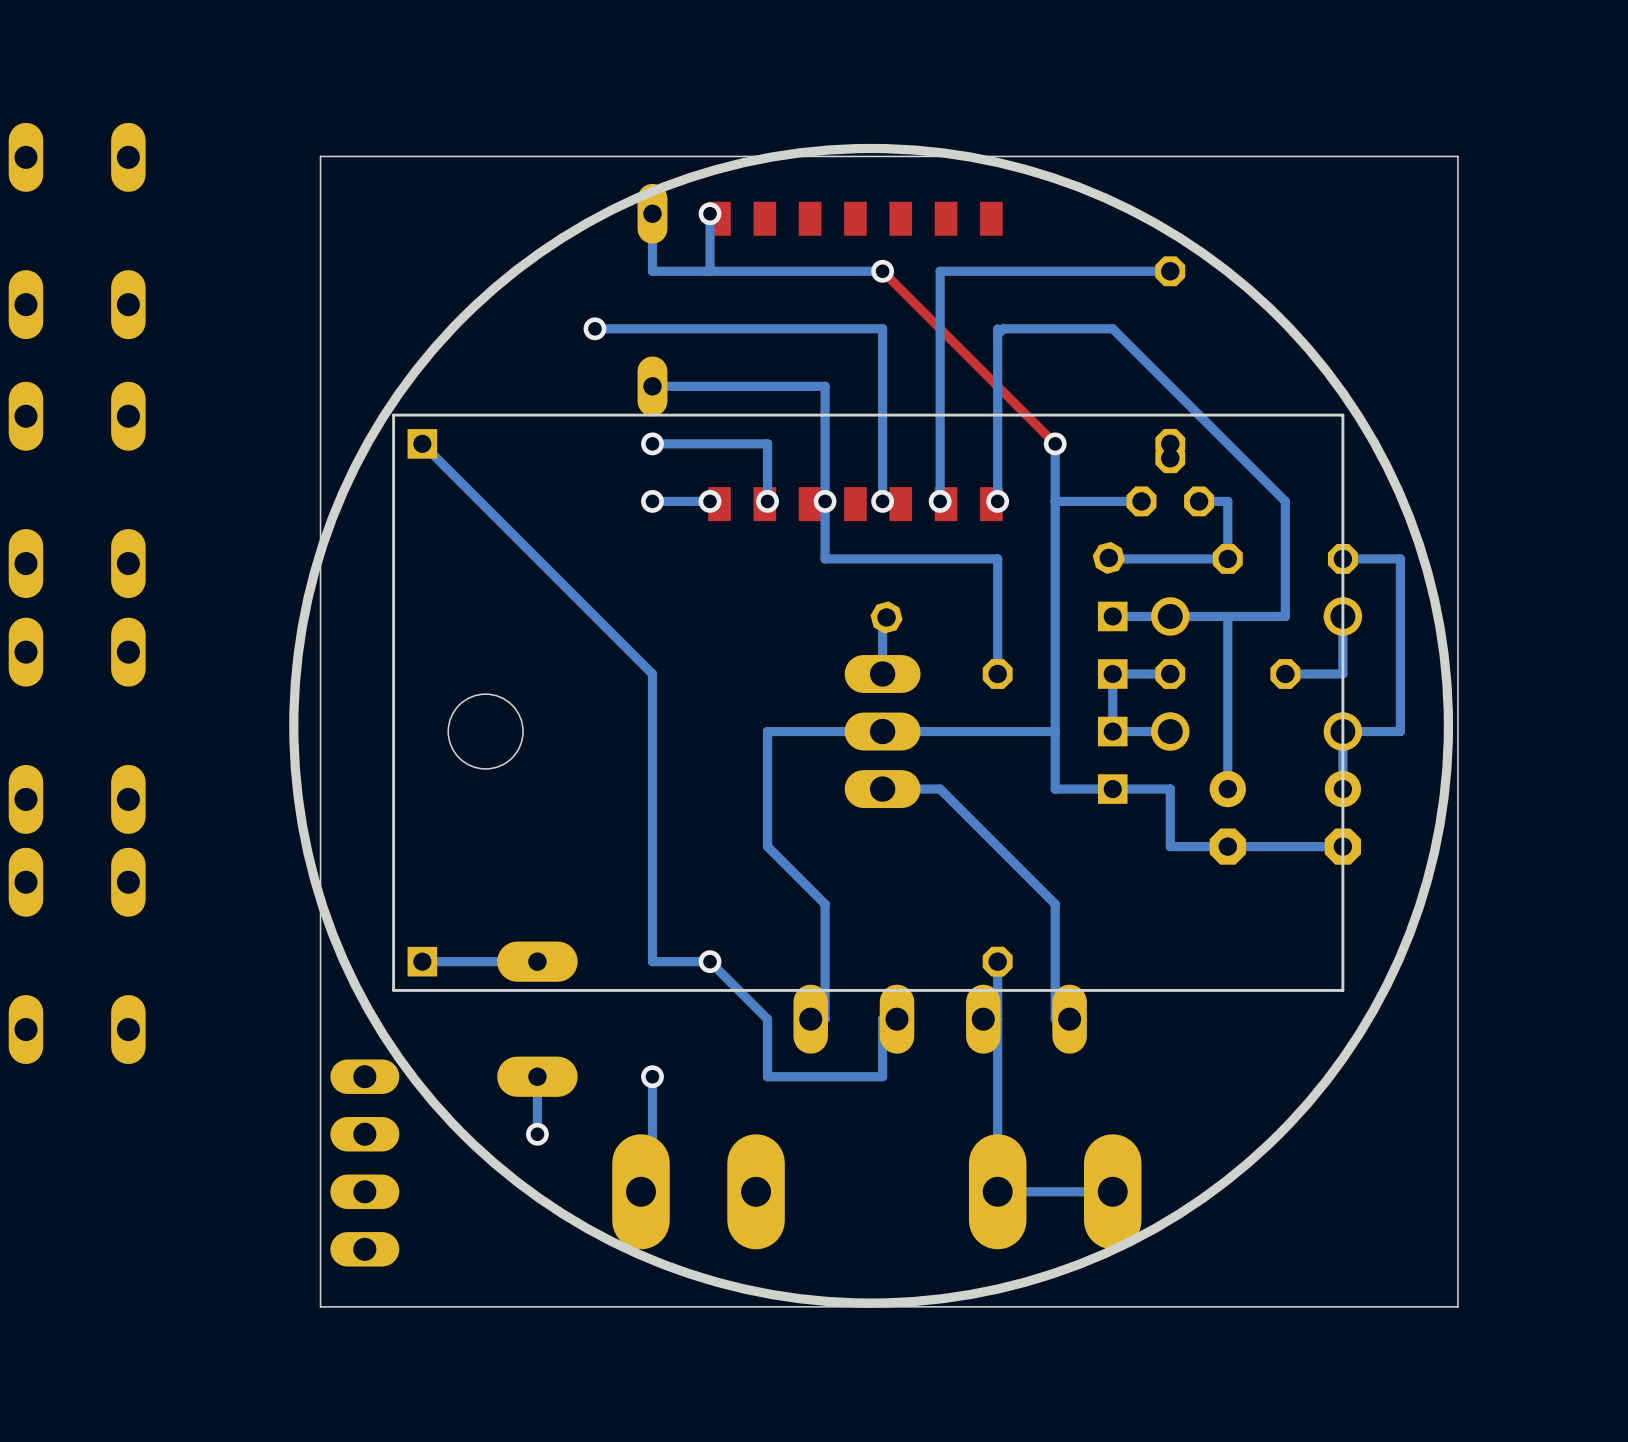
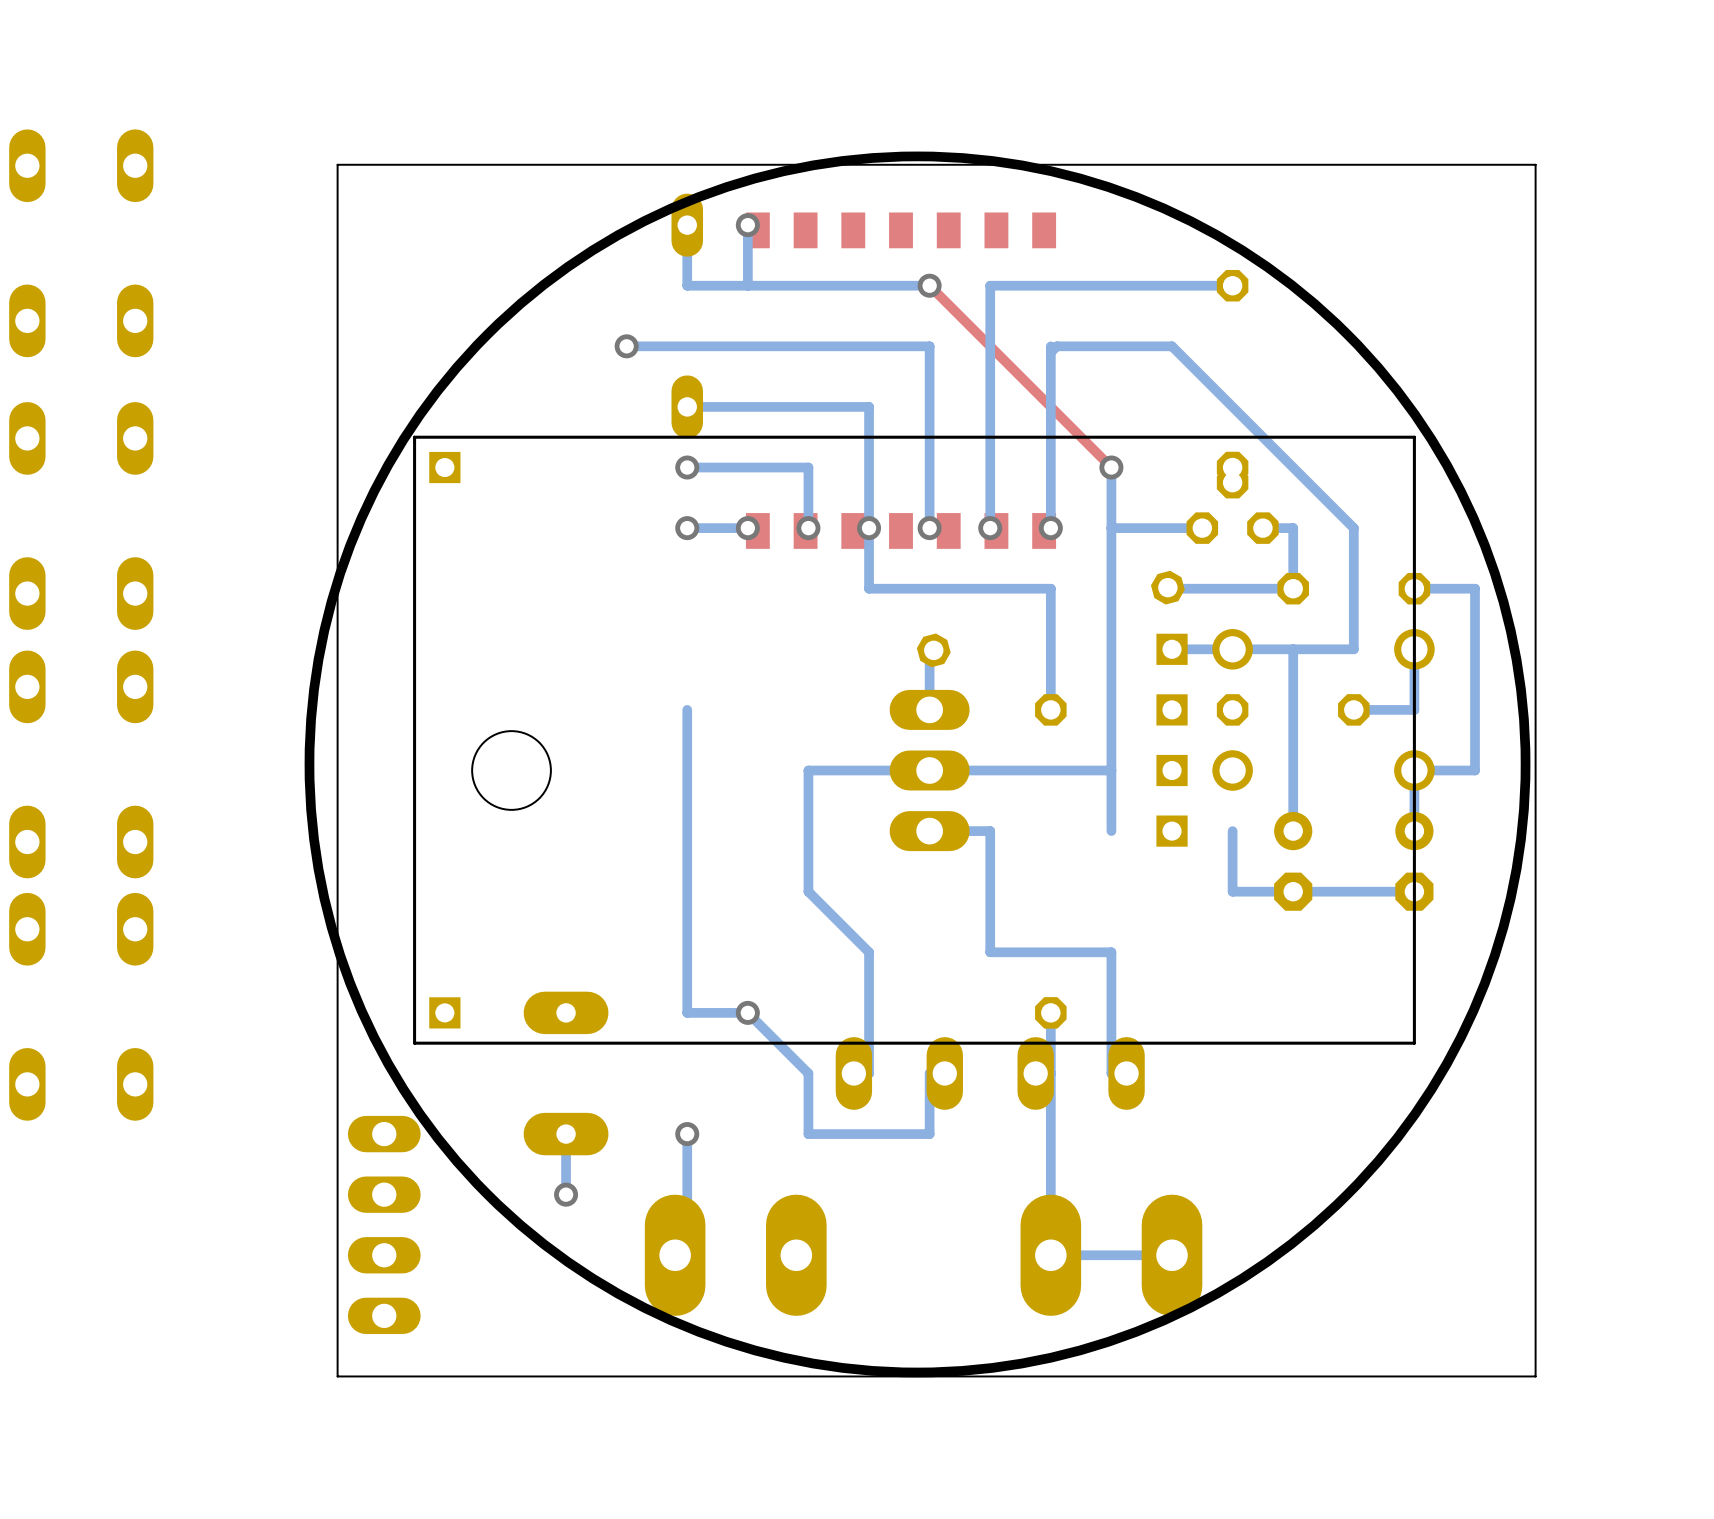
bottom track: (422, 443) (652, 674) -> none
bottom track: (1170, 674) (1112, 674) (1112, 731) (1170, 731) -> none
bottom track: (940, 789) (1055, 904) -> (990, 831) (990, 952) (1111, 952)
bottom track: (1170, 789) (1055, 789) -> none
bottom track: (537, 961) (422, 961) -> none

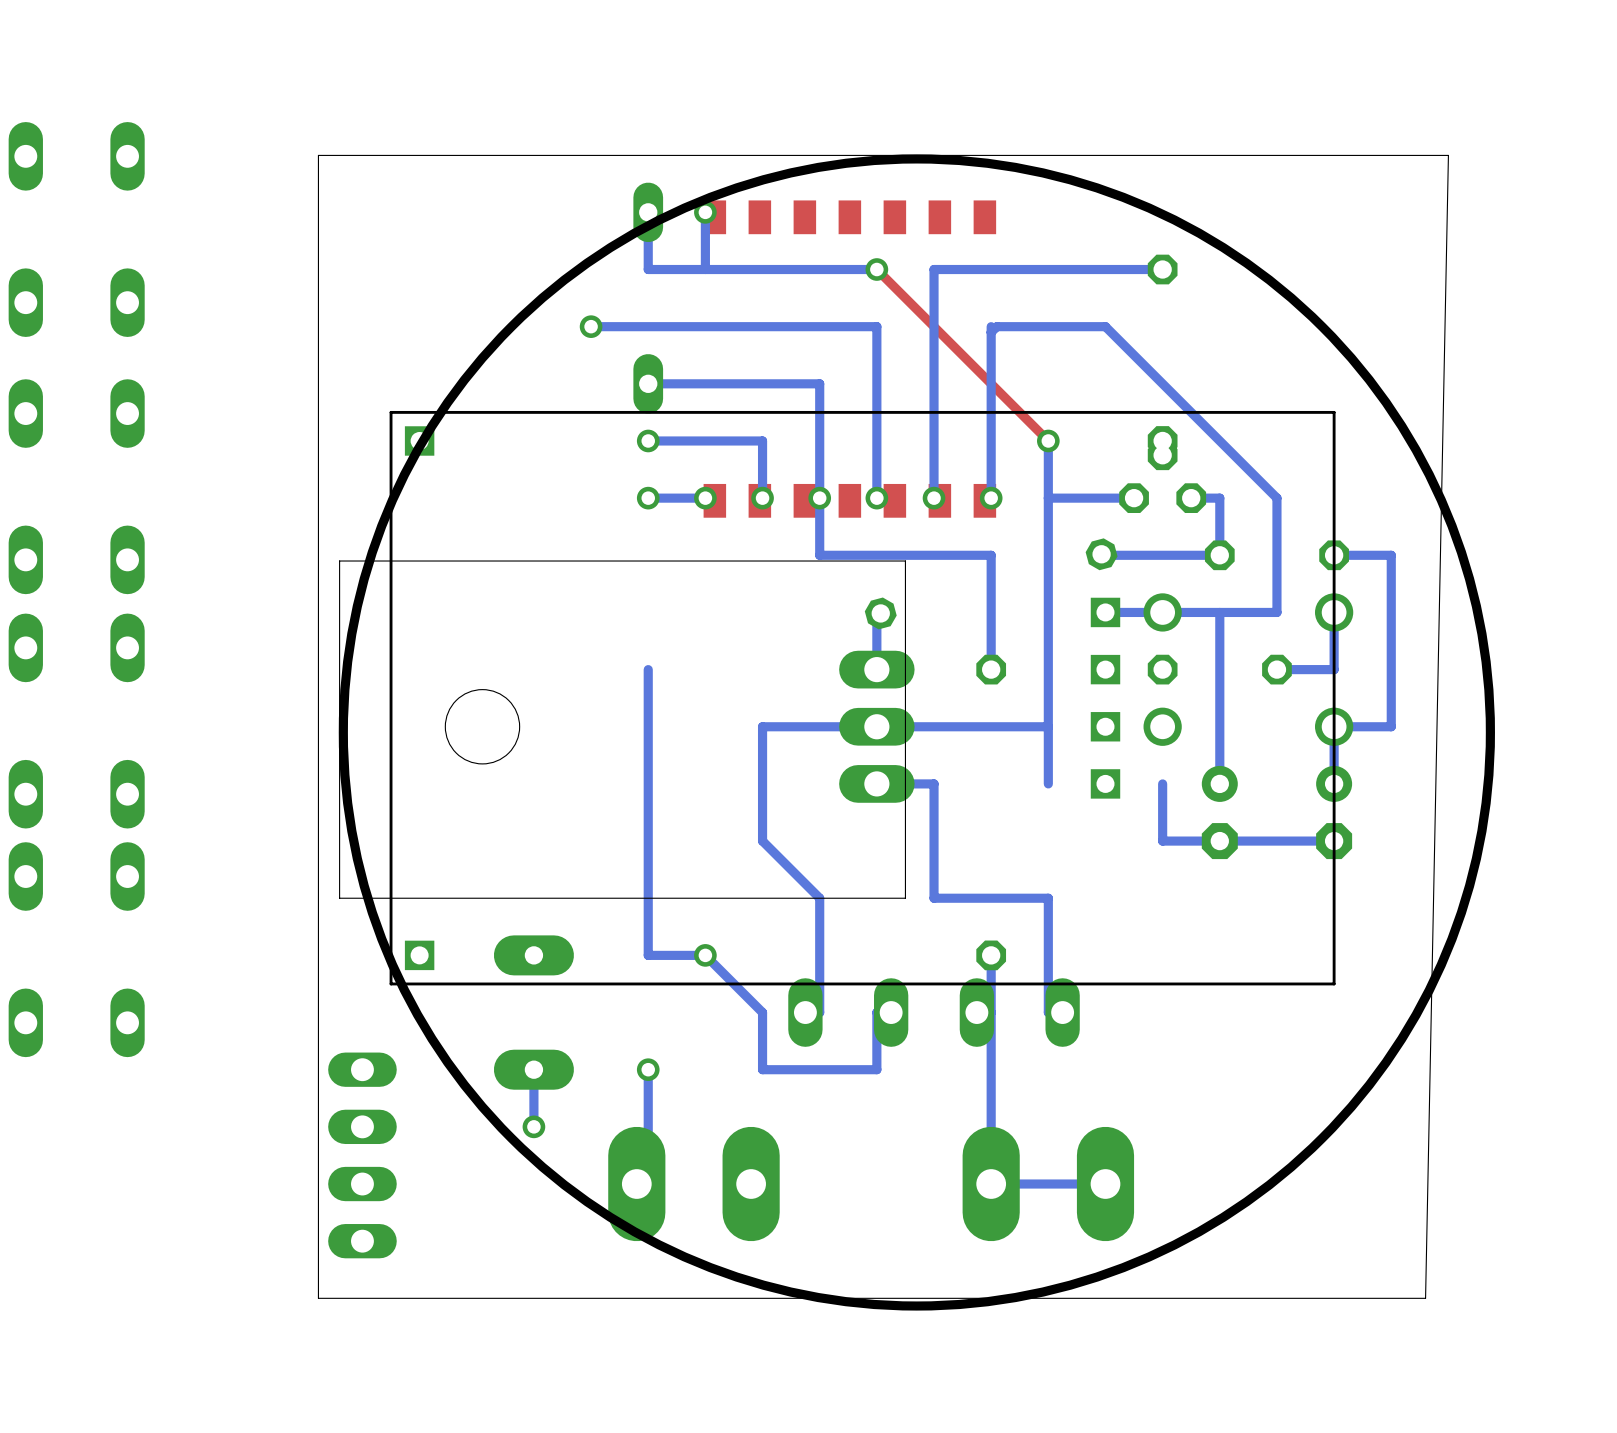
board edge: (1535, 164) (1535, 1376) (1511, 1376) -> (1448, 155) (1425, 1298)
board edge: none -> (905, 561) (339, 561) (339, 898) (905, 898) (905, 561)
round board edge position: (917, 764) -> (916, 732)

